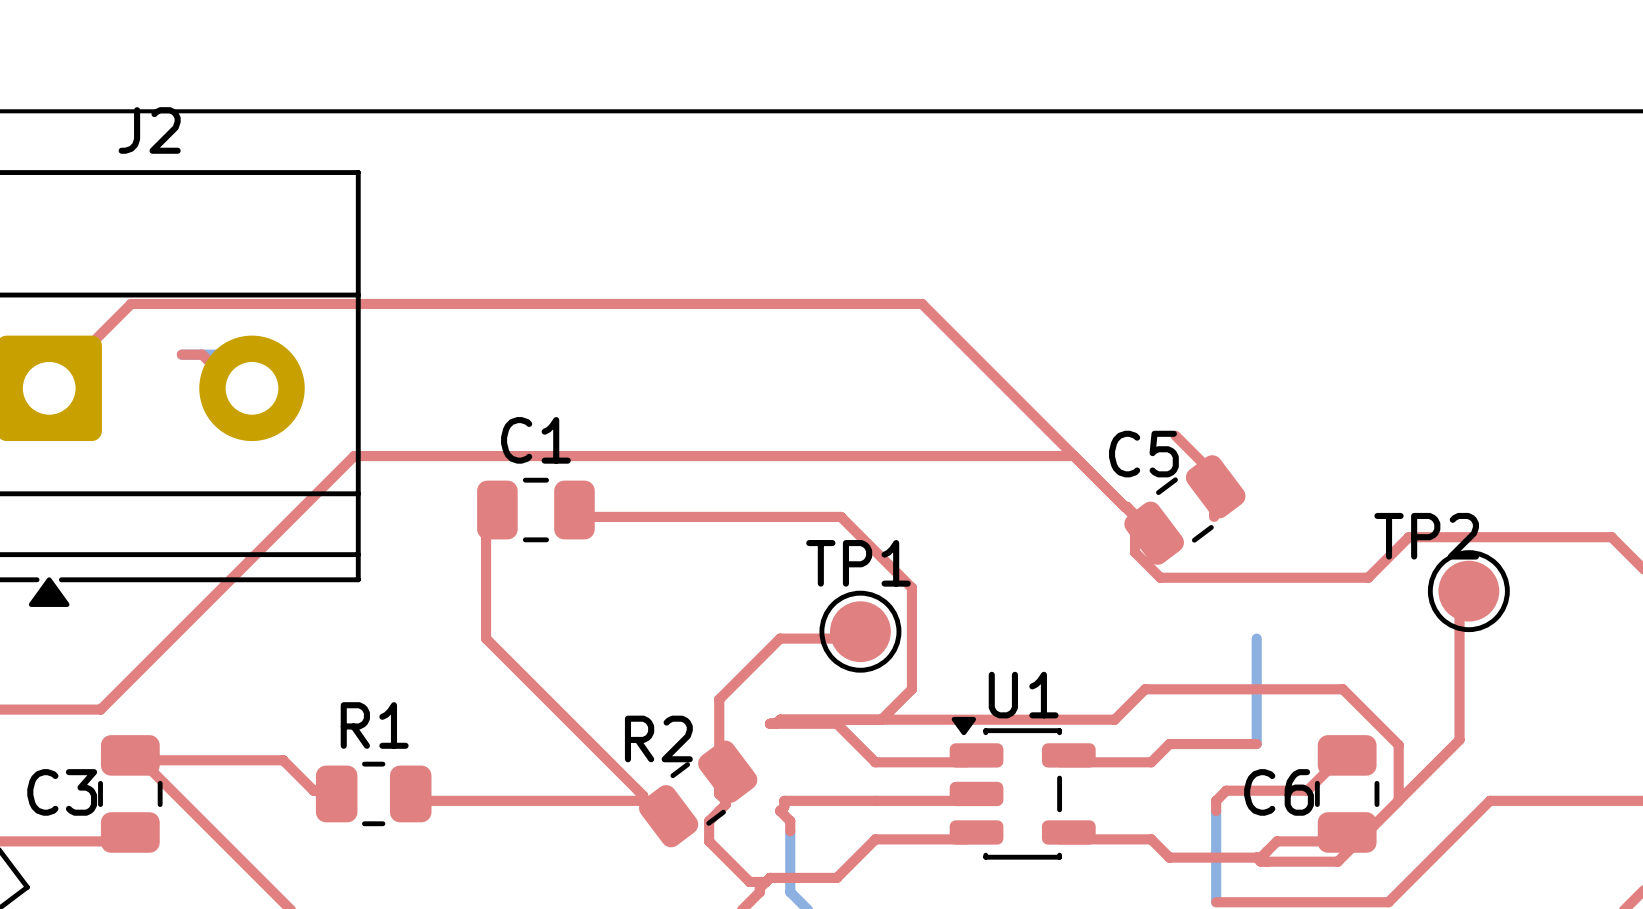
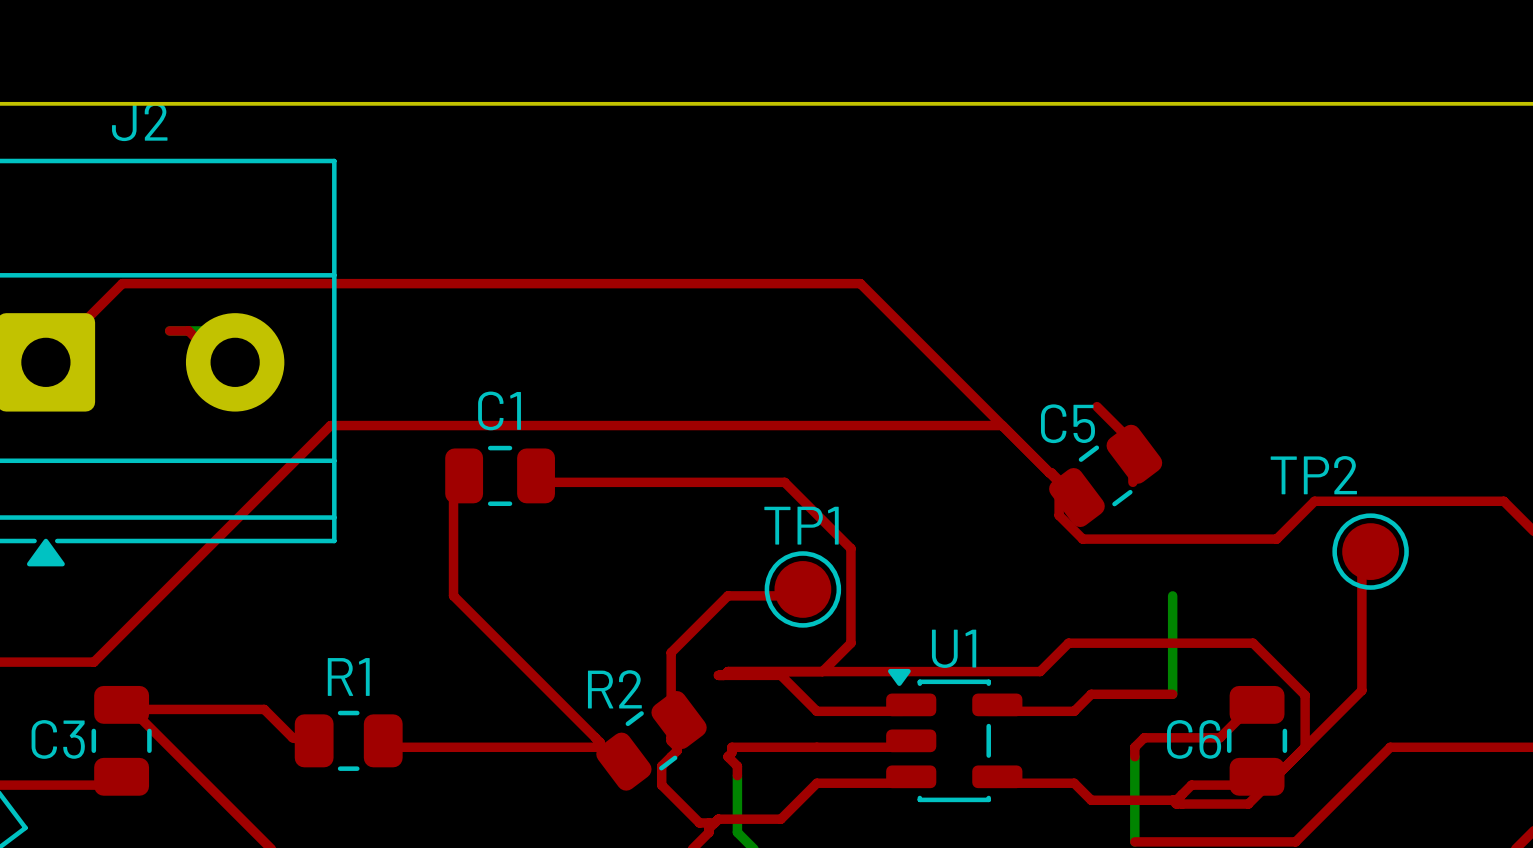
TP2 name position: TP2 (1426, 536) -> TP2 (1313, 475)

